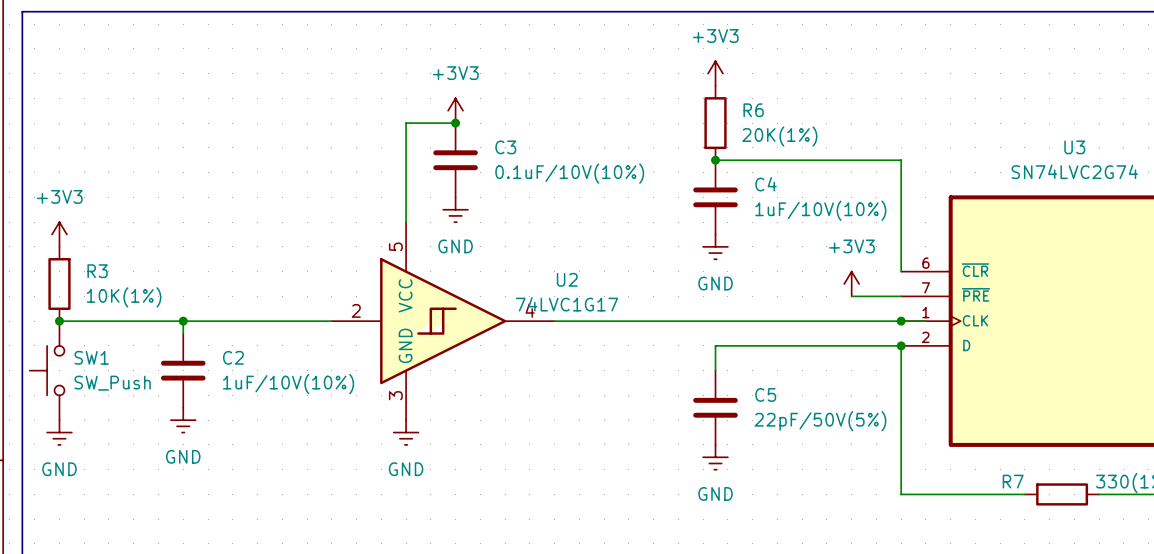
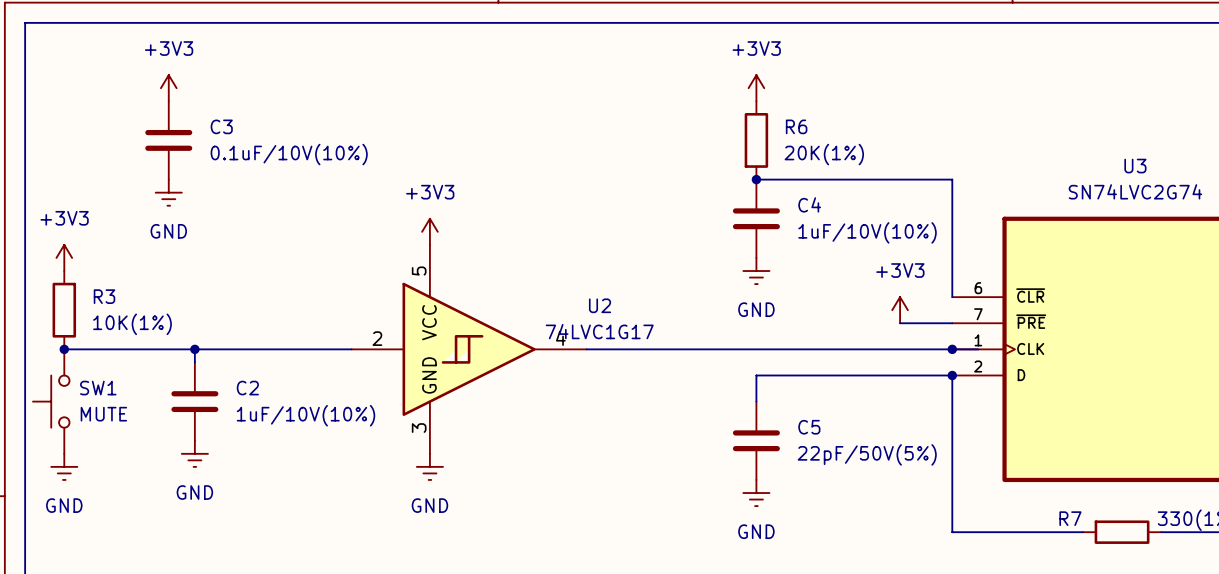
power symbol: none -> +3V3 (168, 88)
power symbol position: +3V3 (455, 110) -> +3V3 (429, 231)
wire: (455, 123) (406, 123) (406, 222) -> none
junction: (455, 123) -> none
C3 position: (455, 160) -> (168, 140)
power symbol: none -> GND (168, 192)
power symbol: GND (455, 209) -> none
SW1 value: SW_Push (112, 383) -> MUTE (103, 414)

